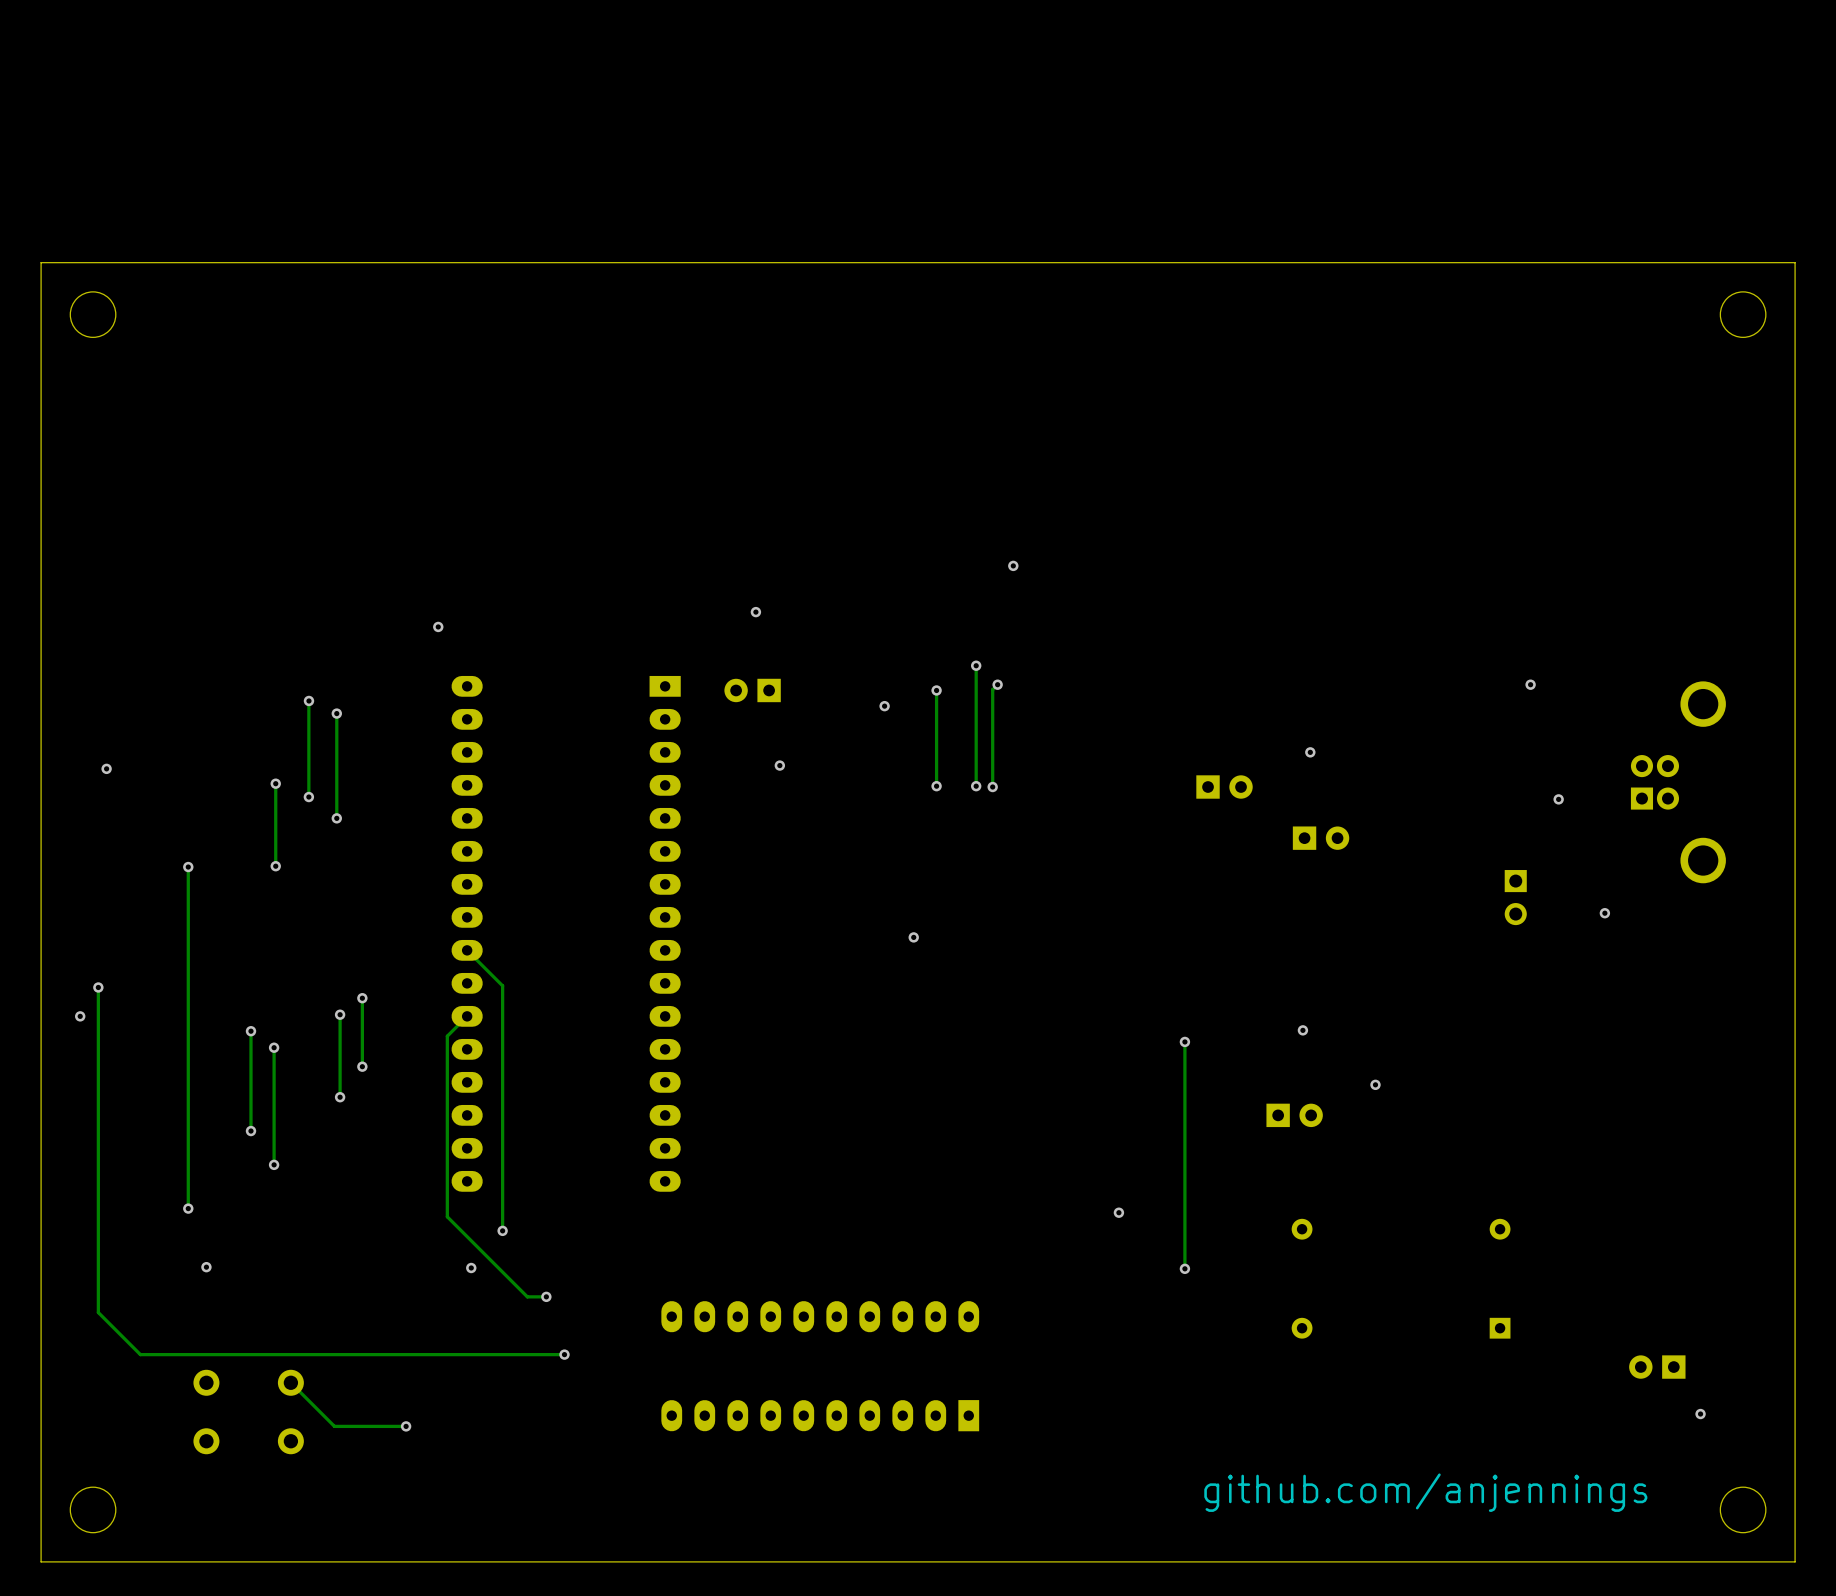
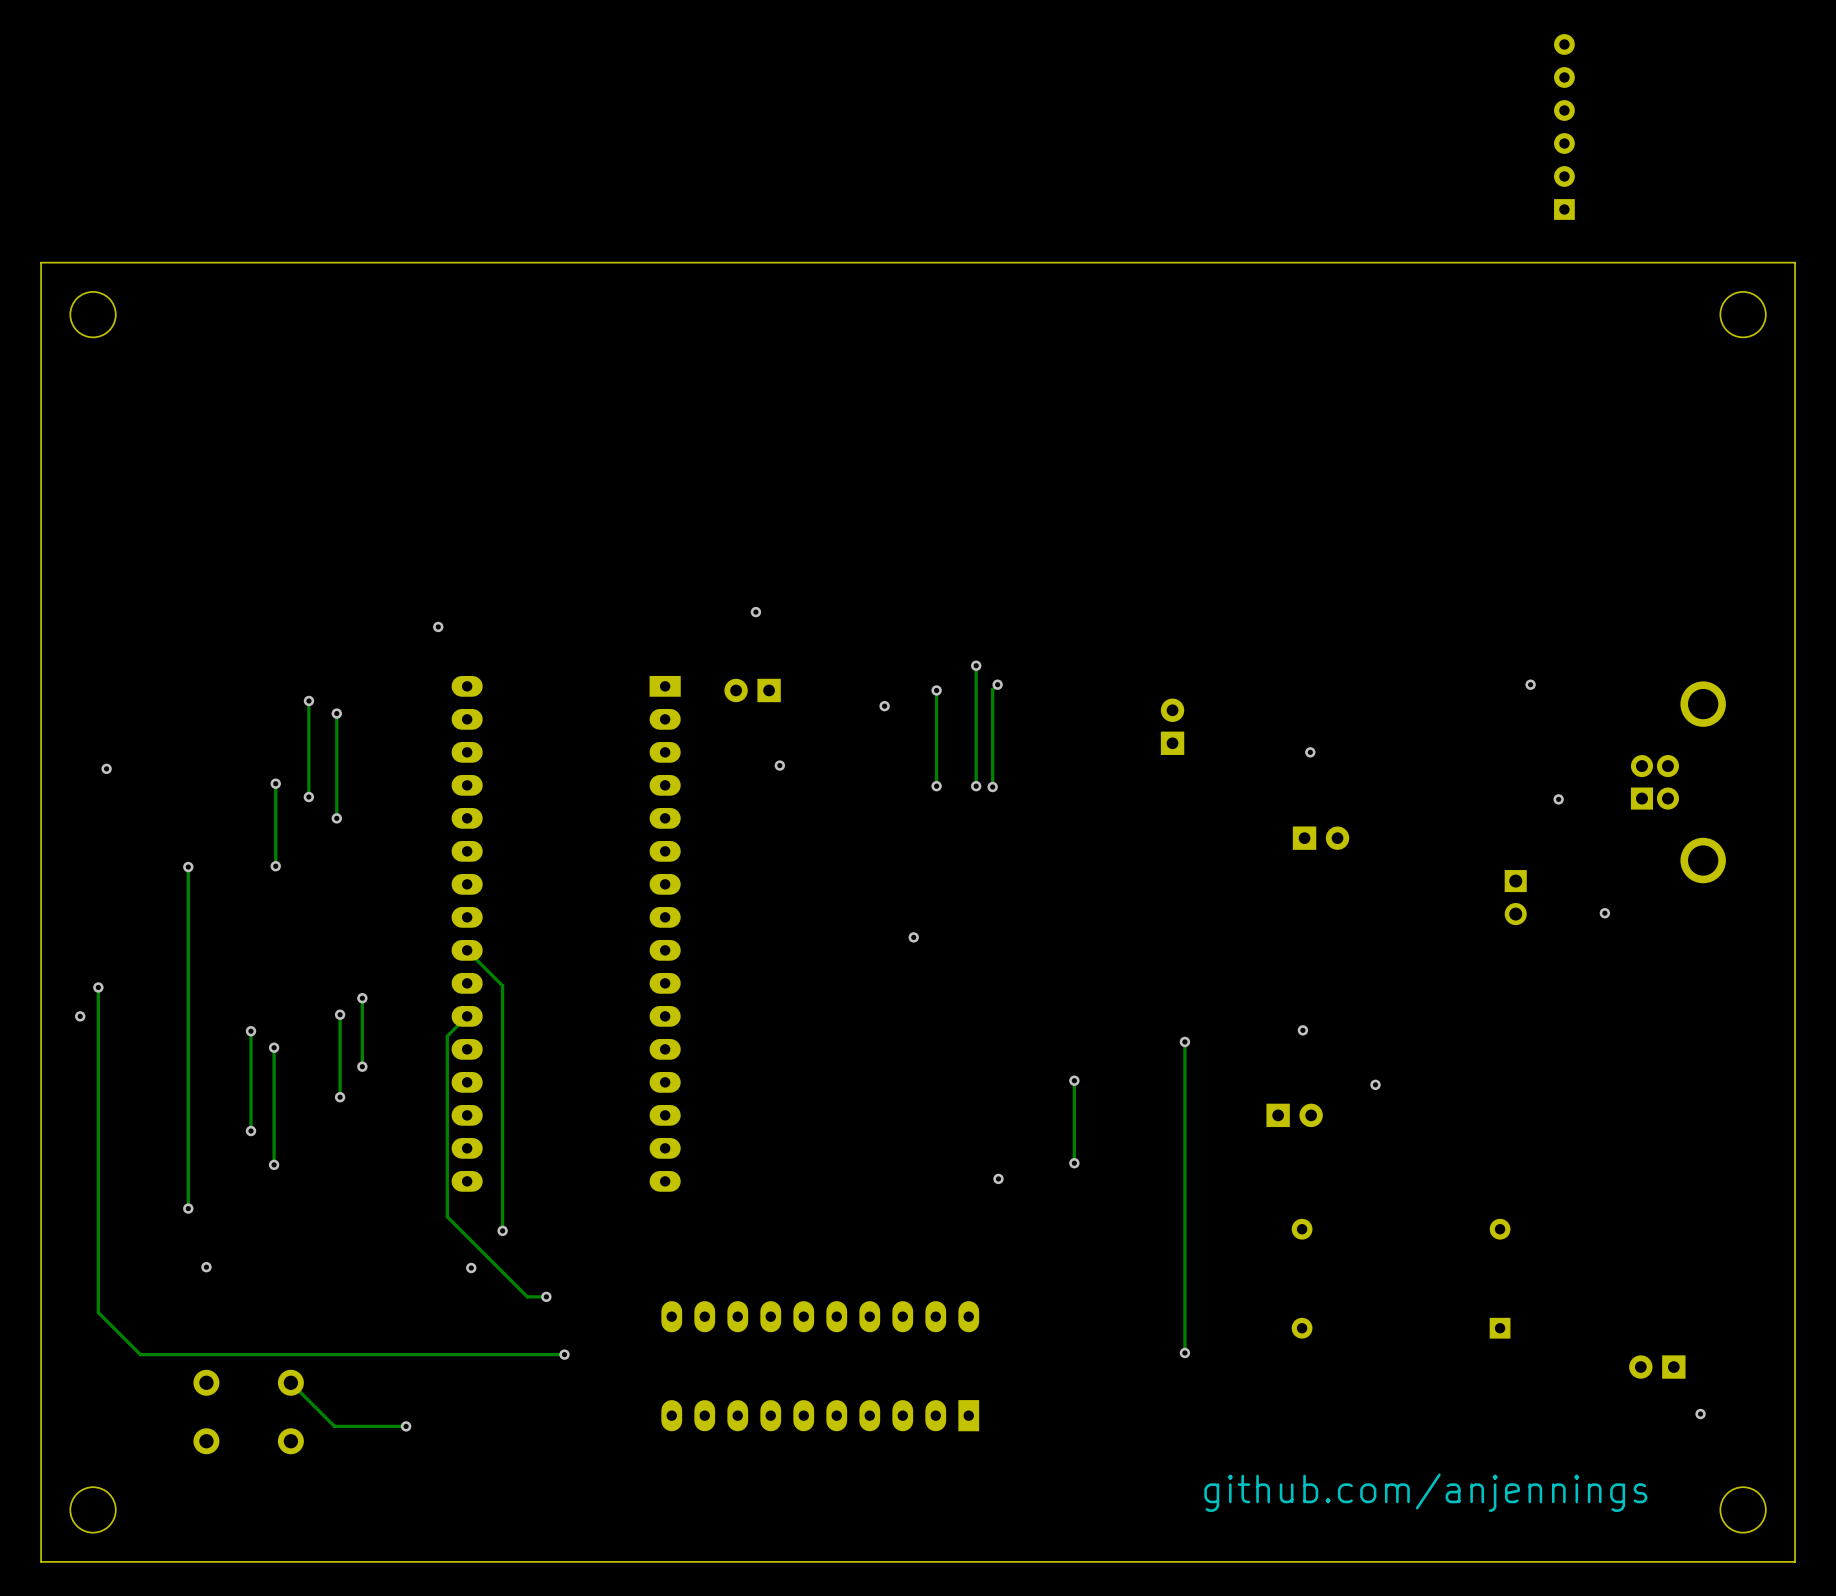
part: none -> (1564, 126)
via: (1013, 565) -> none
part rotation: 0° (1224, 787) -> 90° counterclockwise (1172, 726)
part position: (1224, 787) -> (1172, 726)
track: none -> (1074, 1080) (1074, 1163)
via: none -> (1074, 1080)
via: none -> (1074, 1163)
via: none -> (998, 1178)
via: (1118, 1212) -> none
track: none -> (1184, 1268) (1184, 1352)
via: (1184, 1268) -> none
via: none -> (1184, 1352)

